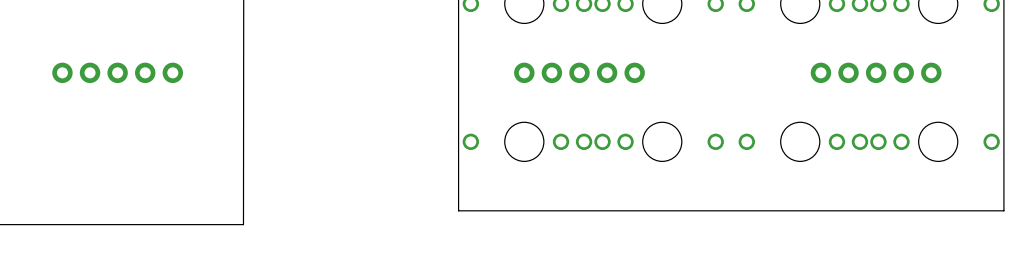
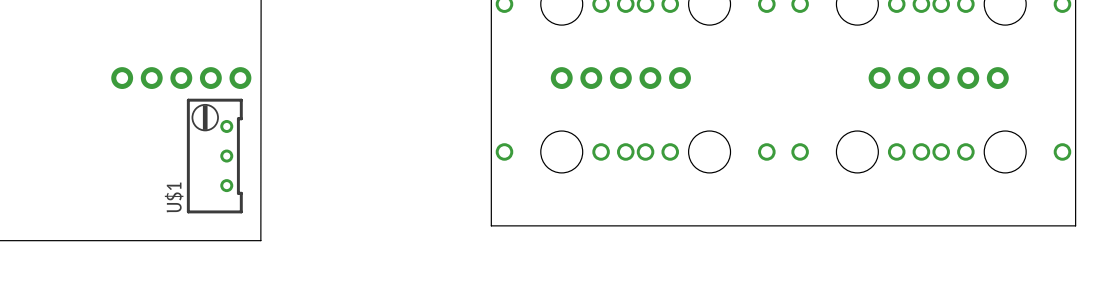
part position: (117, 72) -> (181, 78)
U$1: none -> (214, 156)

